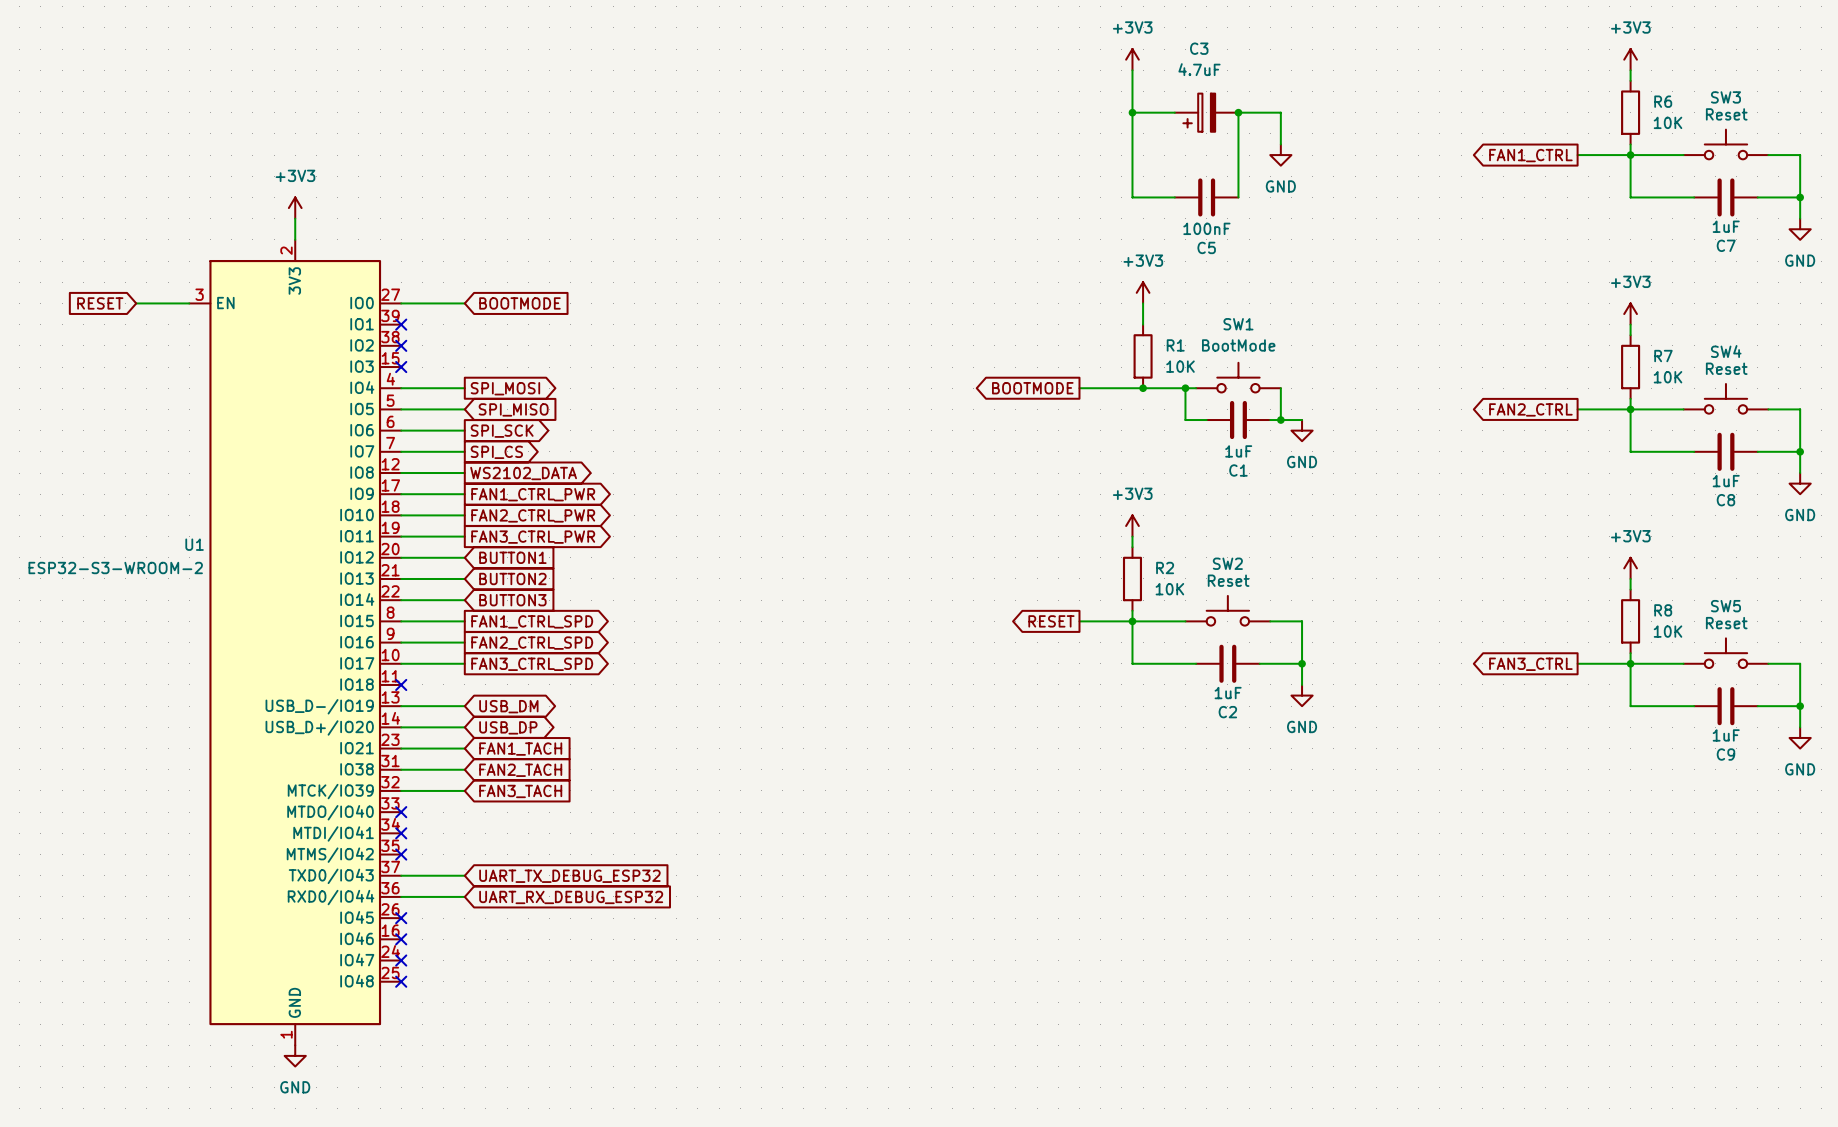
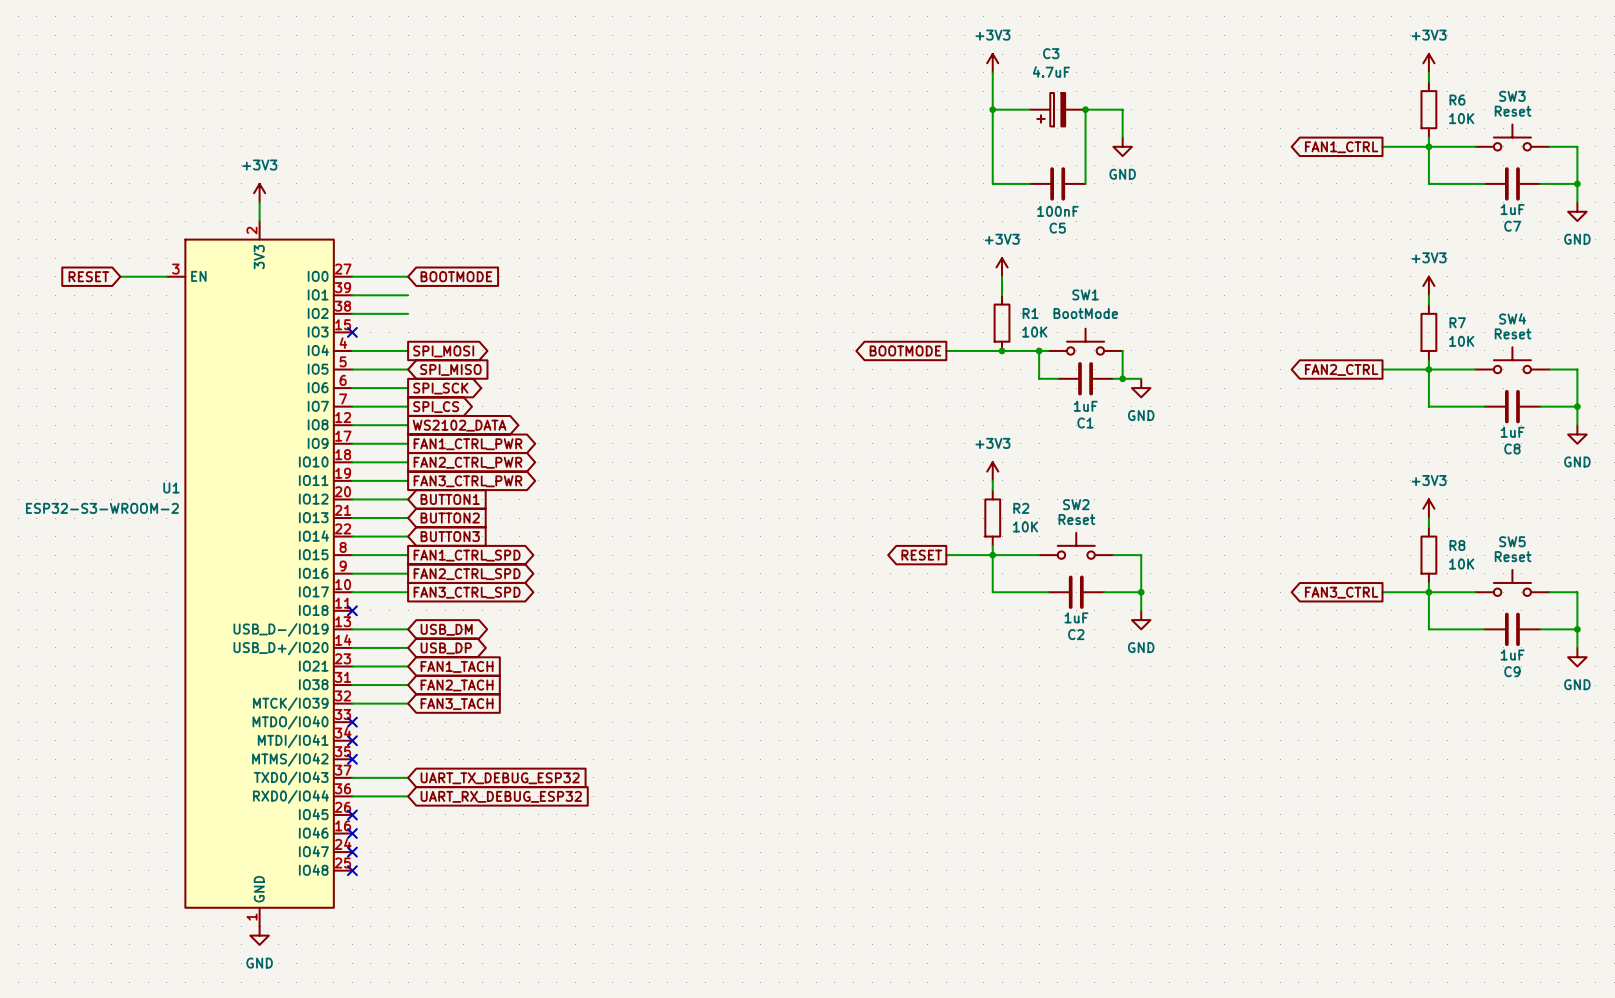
wire: none -> (352, 295) (408, 295)
no-connect mark: (401, 324) -> none
wire: none -> (352, 313) (408, 313)
no-connect mark: (401, 345) -> none

